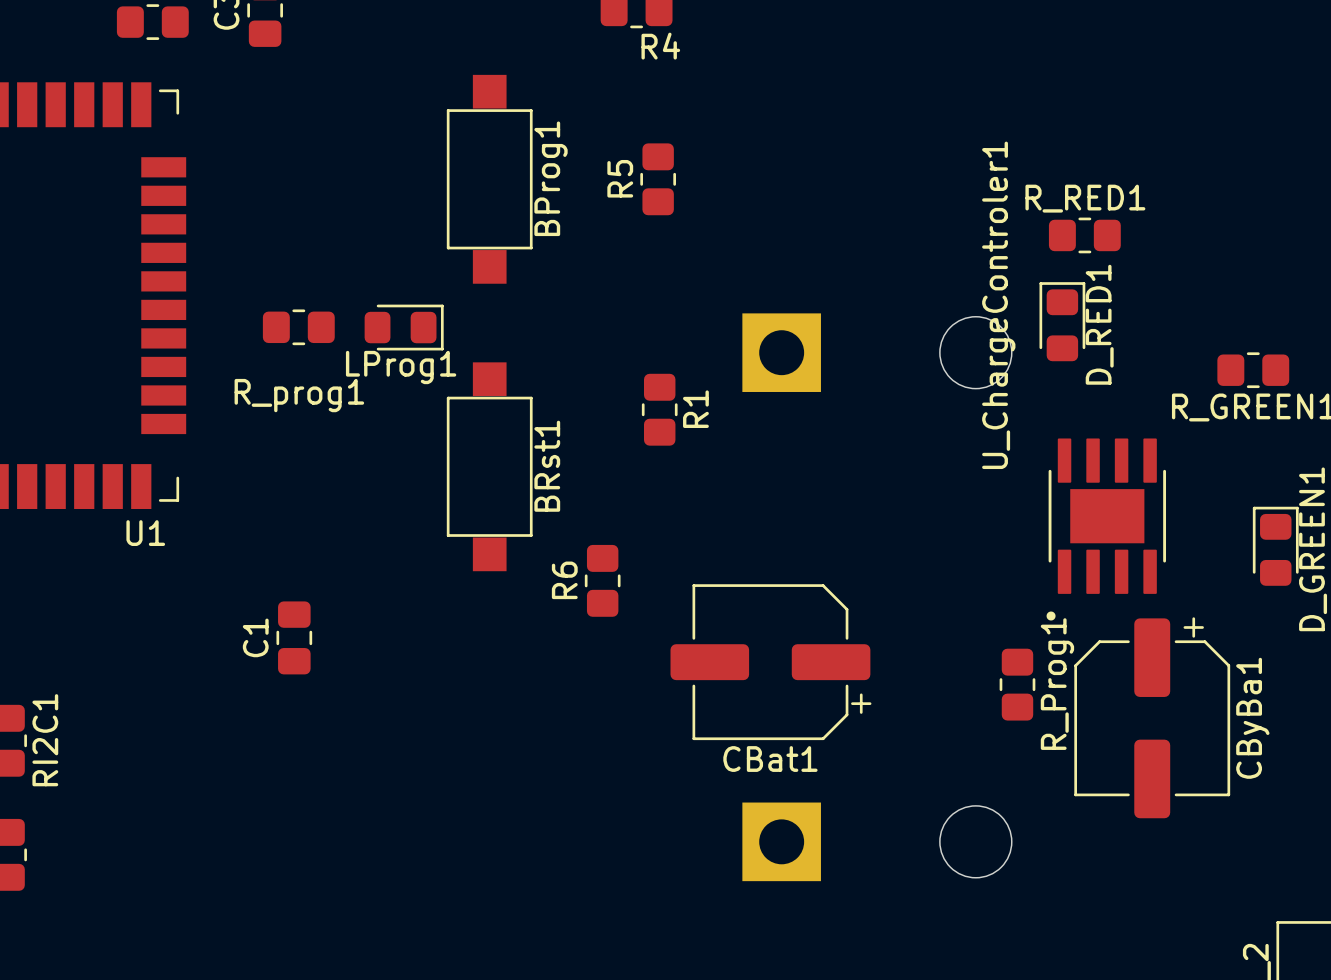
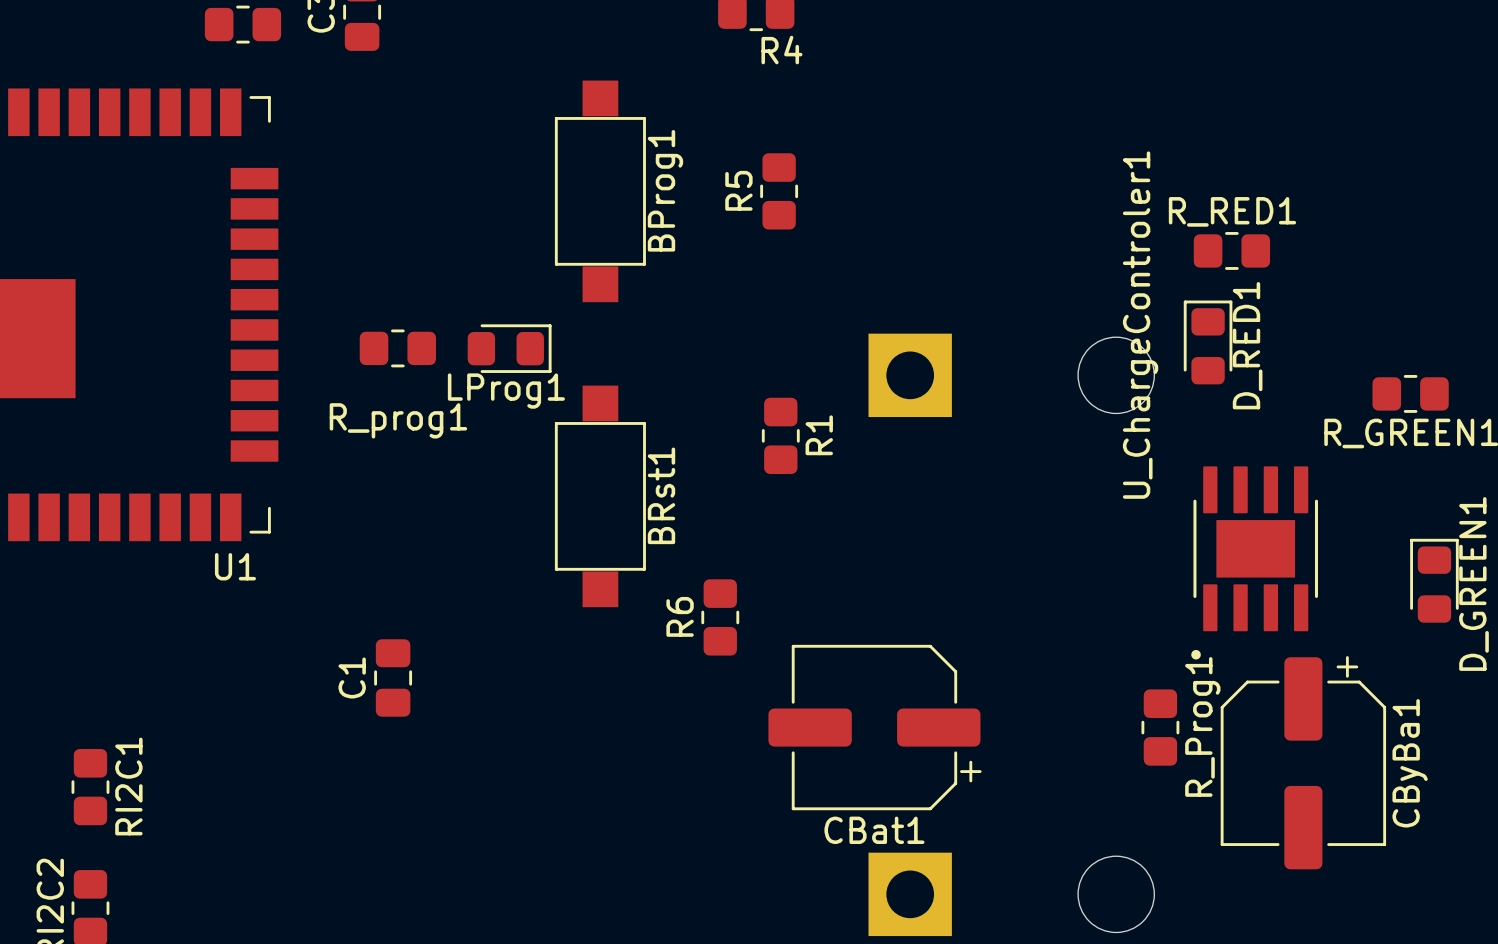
CBat1 position: (770, 662) -> (875, 727)

